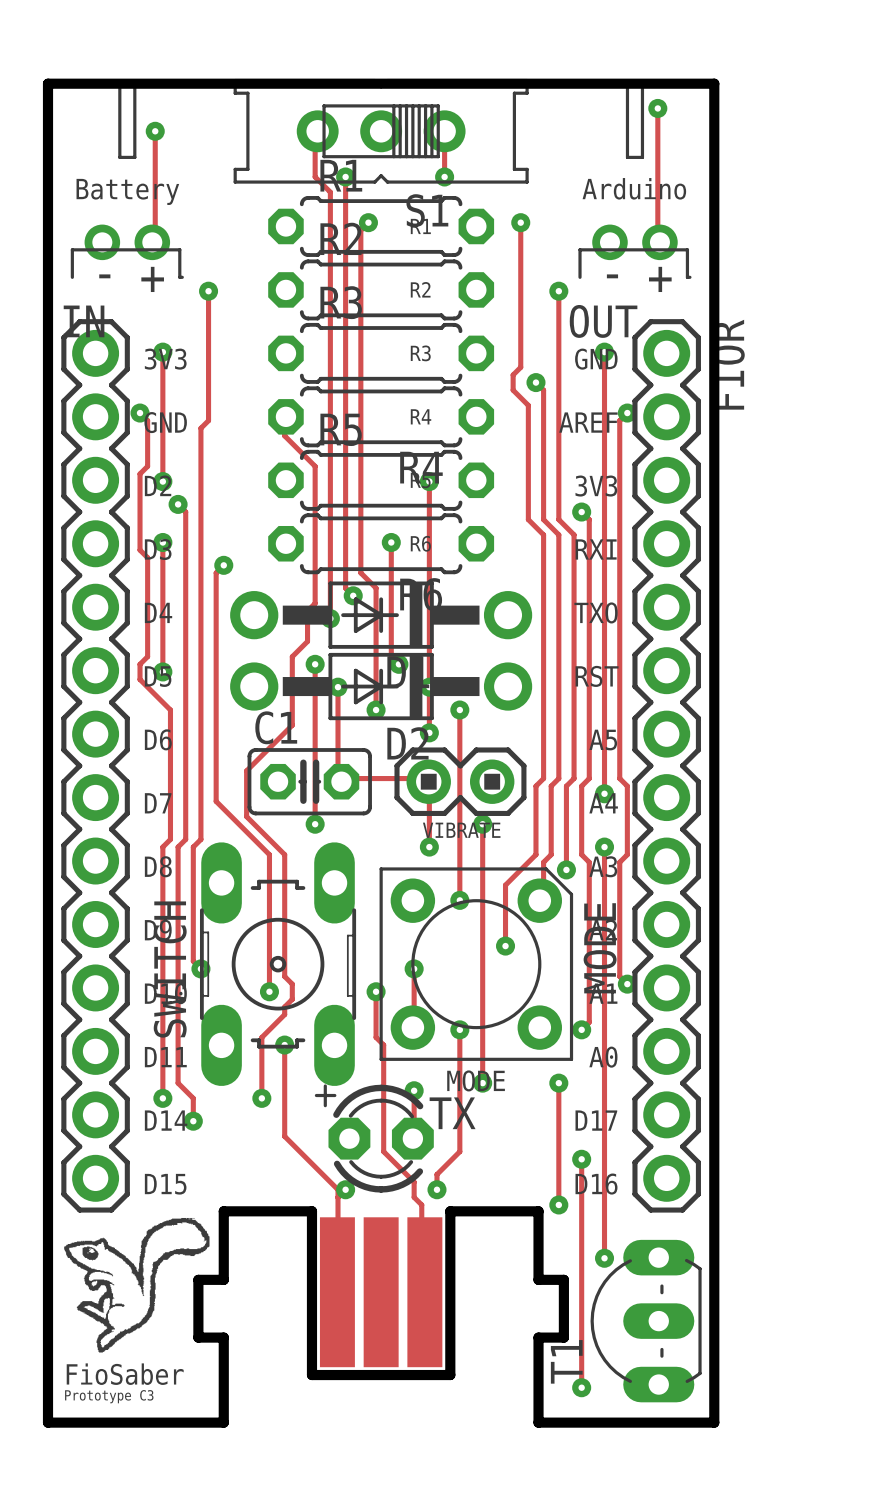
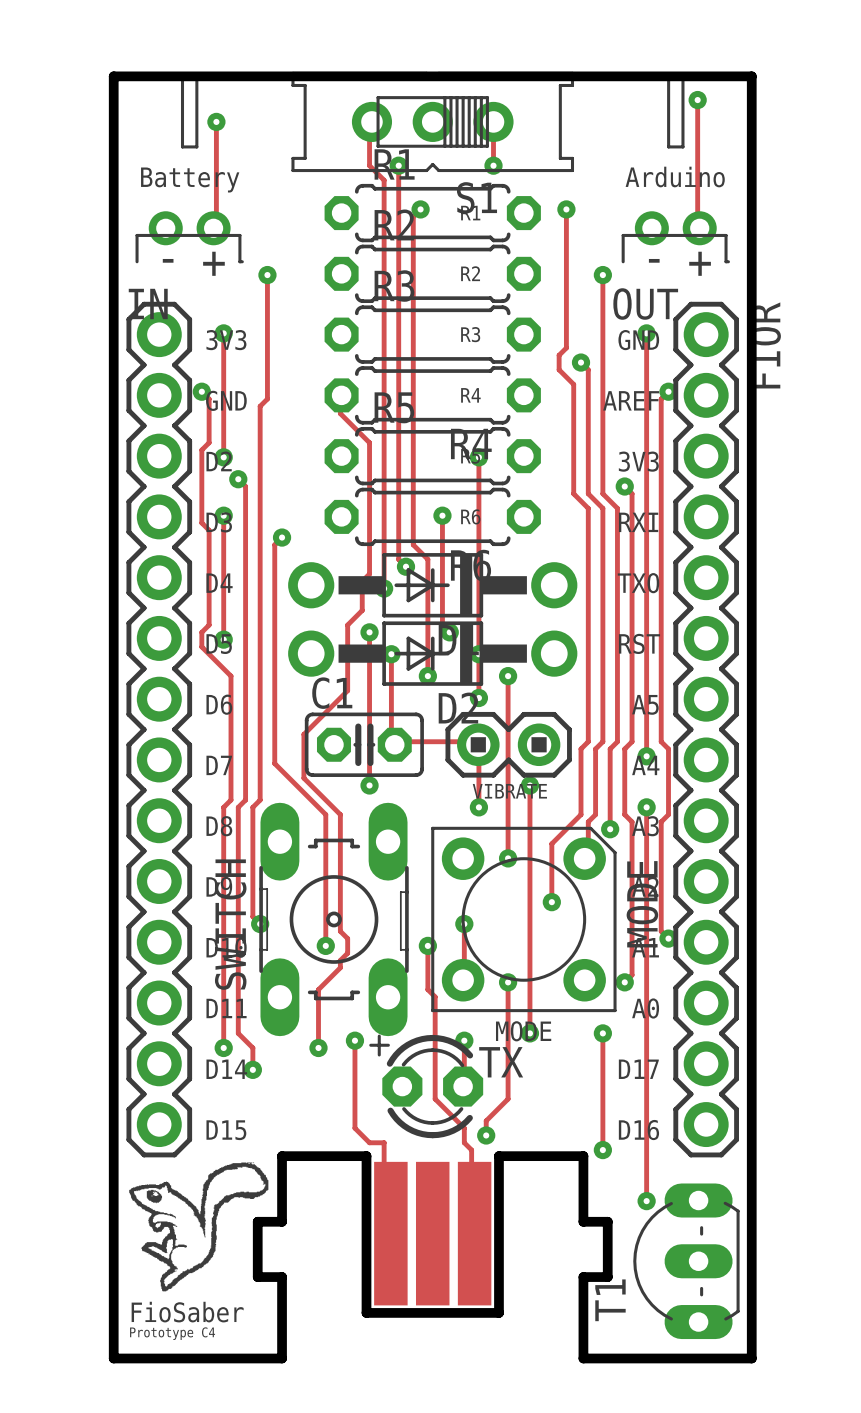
track: (284, 1045) (284, 1136) (338, 1189) (337, 1292) -> (354, 1040) (354, 1128) (369, 1142) (384, 1142) (384, 1230) (390, 1233)
via position: (284, 1045) -> (354, 1040)
track: (581, 1159) (581, 1387) -> none
via: (581, 1159) -> none
via: (345, 1189) -> none
via: (581, 1387) -> none
text: Prototype C3 (109, 1396) -> Prototype C4 (172, 1333)

